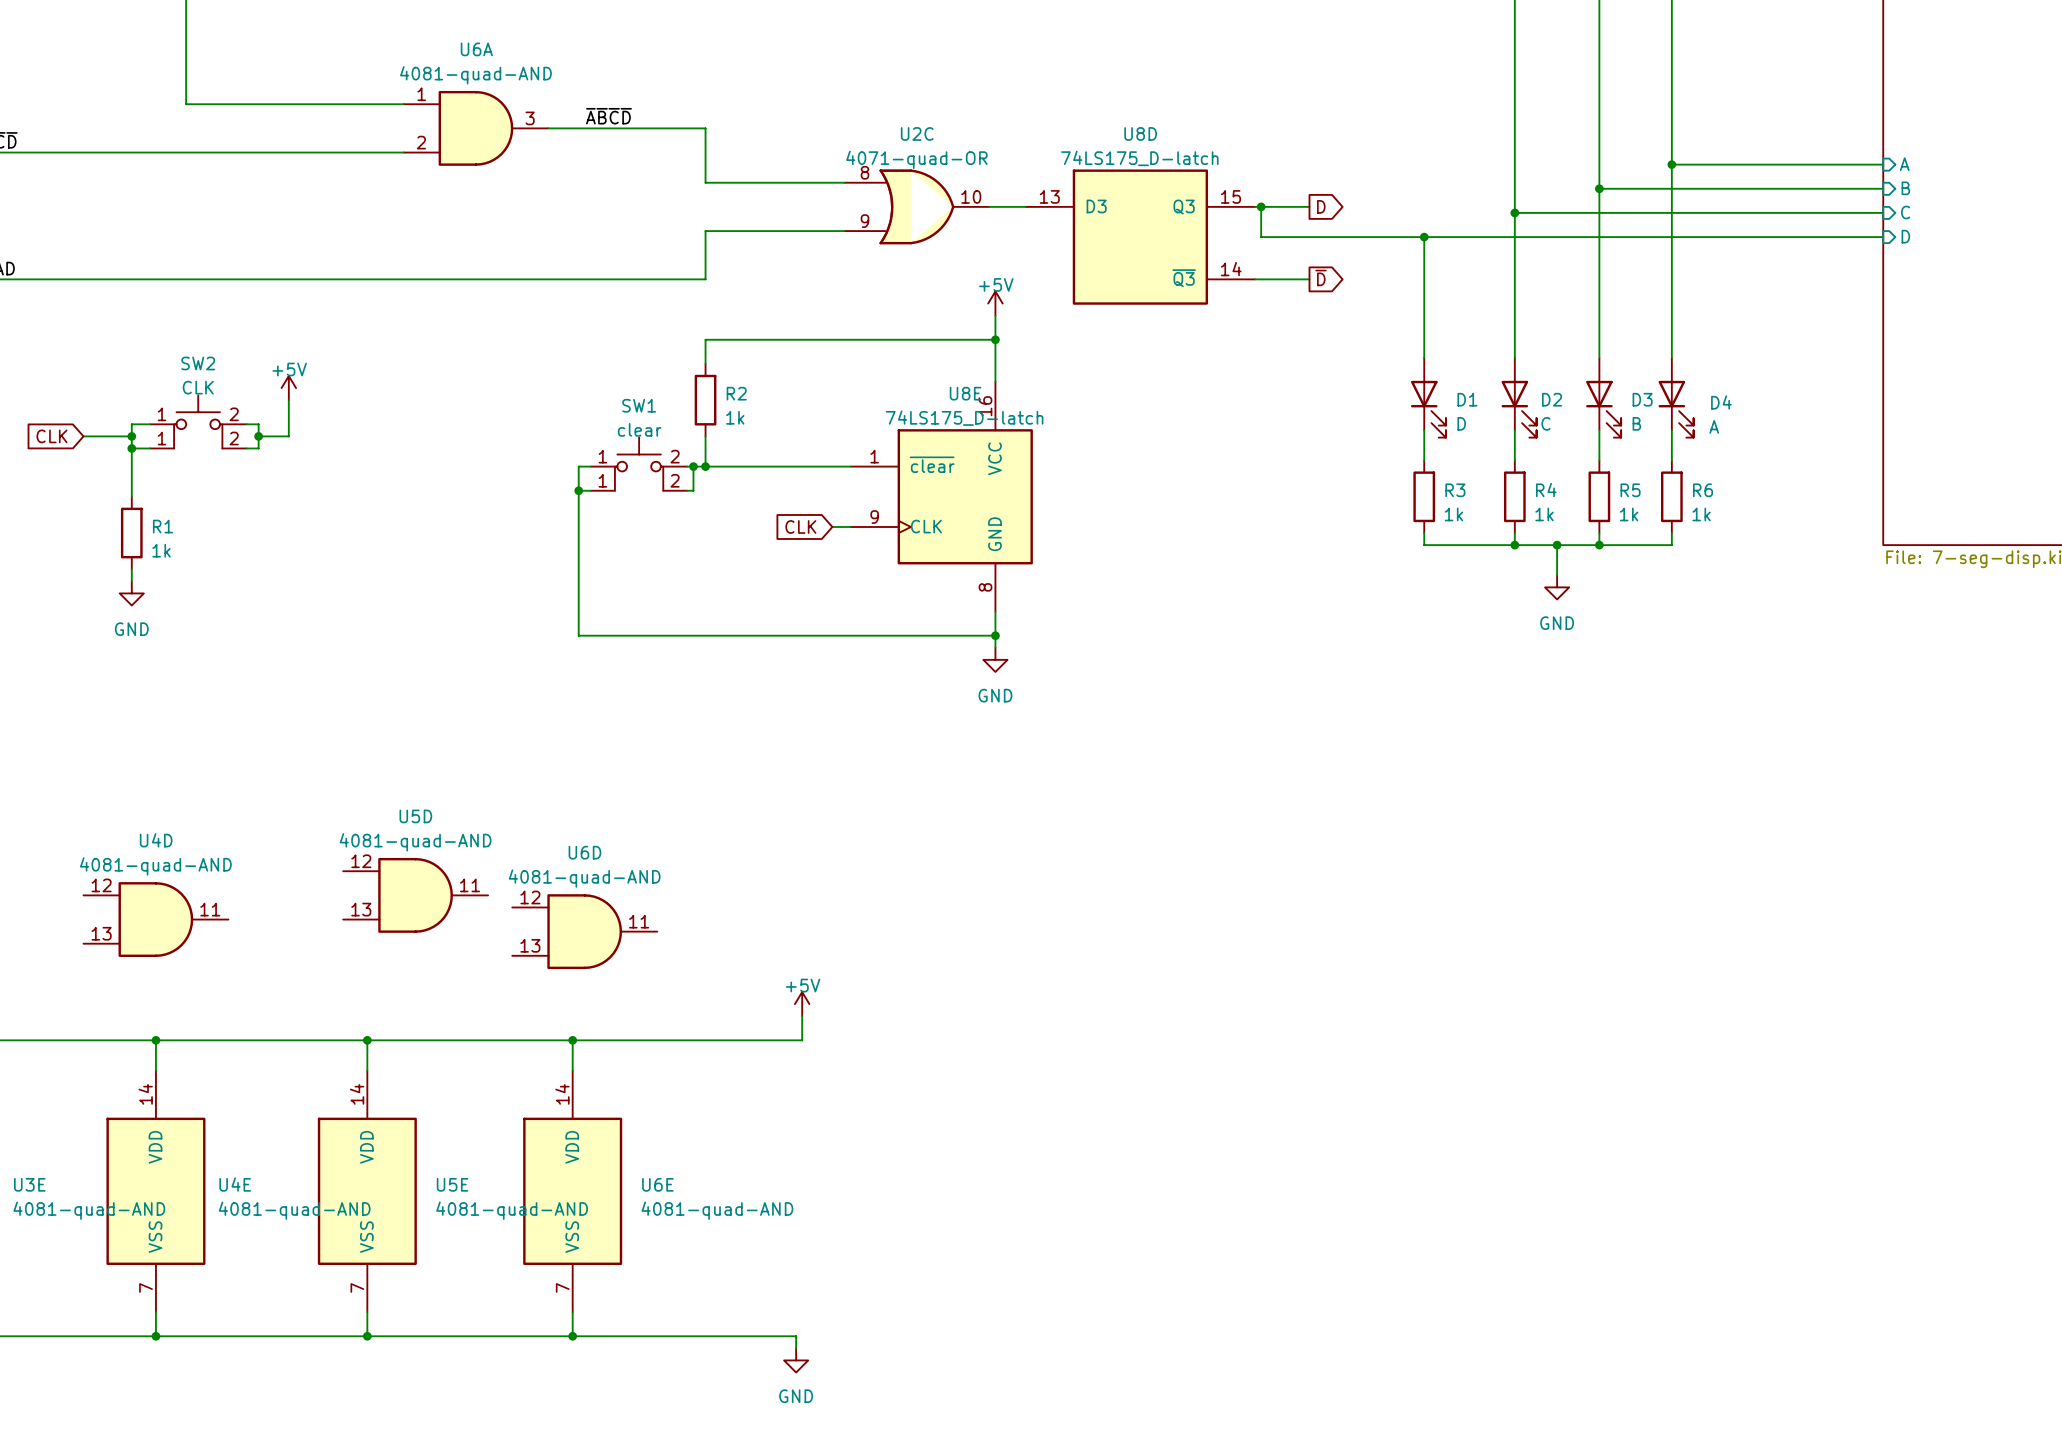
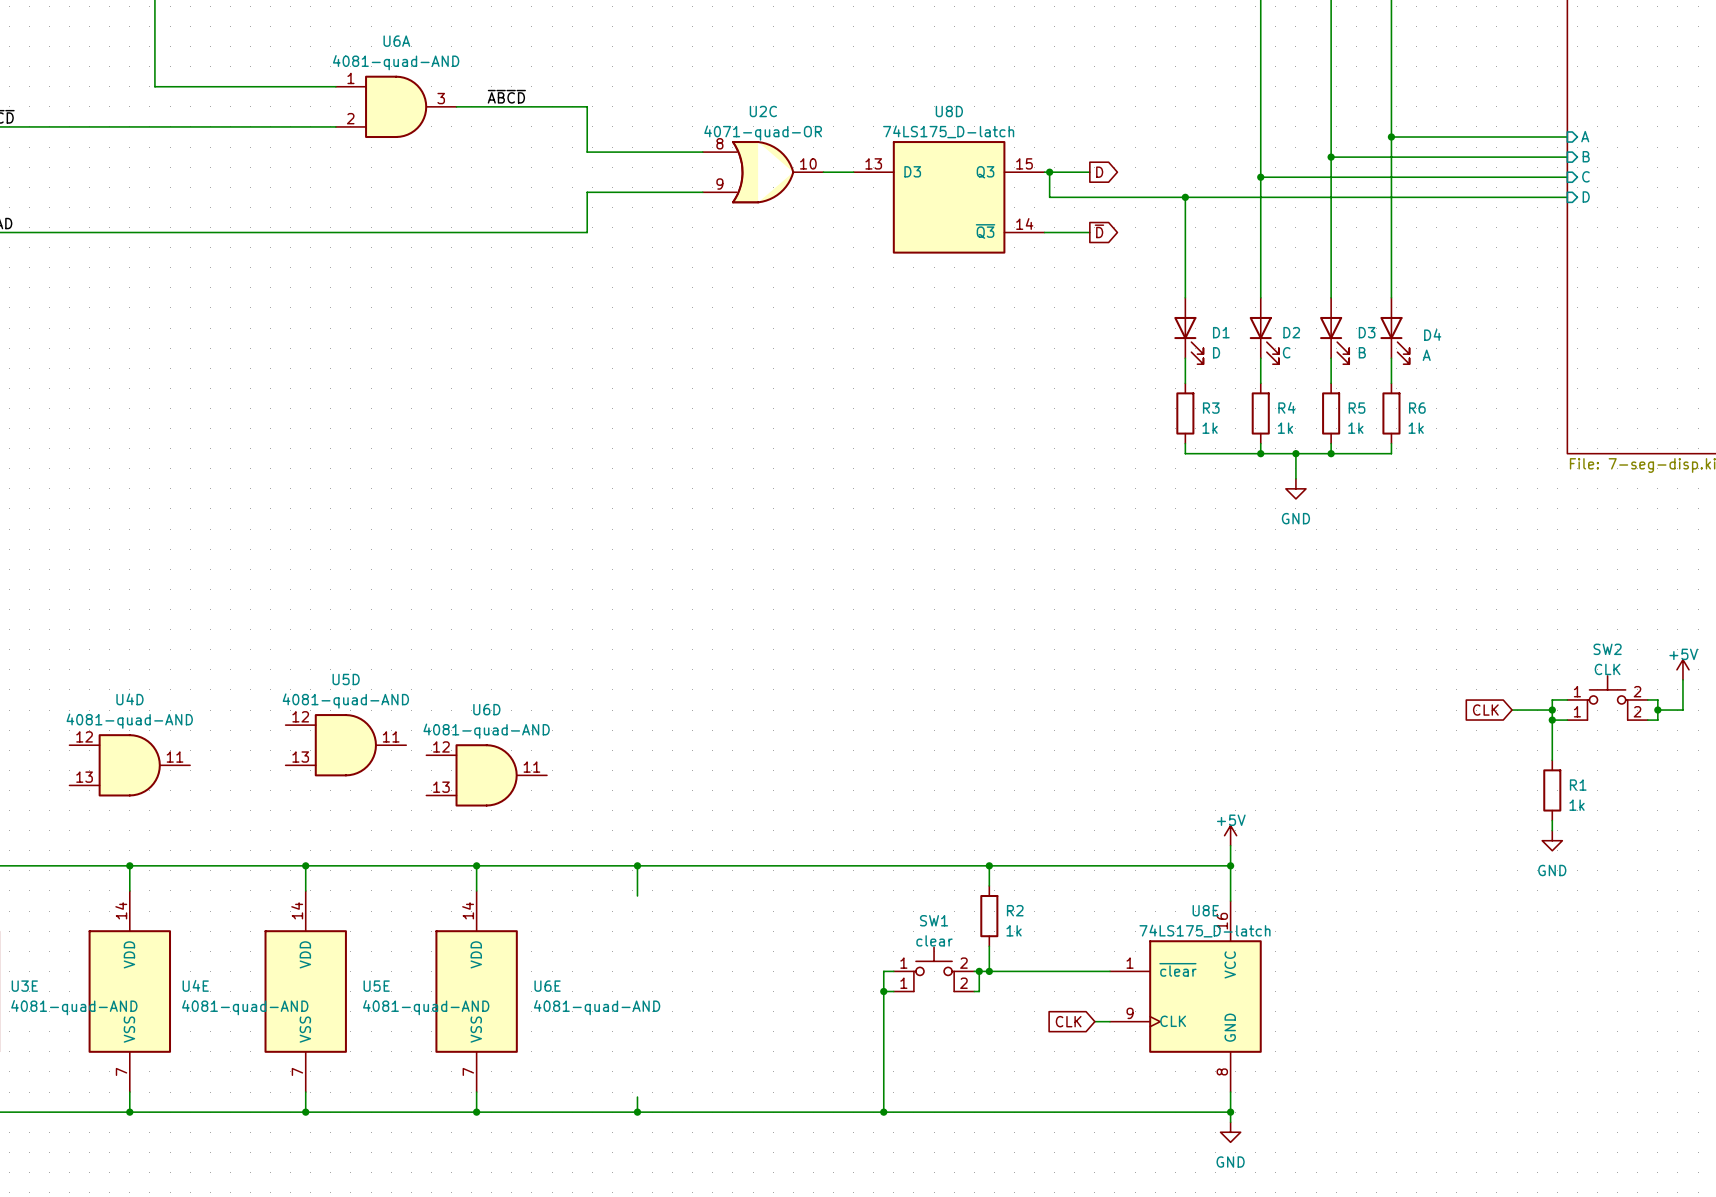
power symbol: +5V (995, 303) -> none
wire: (995, 315) (995, 382) -> none
wire: (995, 339) (705, 339) (705, 363) -> none
junction: (995, 339) -> none
power symbol: +5V (288, 388) -> none
wire: (288, 400) (288, 436) (258, 436) -> none
R2 position: (705, 400) -> (989, 916)
SW2 position: (198, 421) -> (1607, 697)
wire: (149, 424) (131, 424) (131, 496) -> none
wire: (246, 424) (258, 424) (258, 448) (246, 448) -> none
global label: CLK (51, 436) -> none
wire: (83, 436) (131, 436) -> none
junction: (131, 436) -> none
junction: (258, 436) -> none
wire: (705, 436) (705, 466) -> none
wire: (131, 448) (149, 448) -> none
junction: (131, 448) -> none
SW1 position: (639, 464) -> (934, 969)
wire: (590, 466) (578, 466) (578, 635) (995, 635) -> none
wire: (687, 466) (850, 466) -> none
wire: (693, 466) (693, 490) (687, 490) -> none
junction: (693, 466) -> none
junction: (705, 466) -> none
wire: (578, 490) (590, 490) -> none
junction: (578, 490) -> none
U8E position: (941, 496) -> (1185, 996)
global label: CLK (800, 526) -> none
wire: (832, 526) (850, 526) -> none
R1 position: (131, 533) -> (1552, 790)
wire: (131, 569) (131, 581) -> none
power symbol: GND (131, 593) -> none
wire: (995, 611) (995, 647) -> none
junction: (995, 635) -> none
power symbol: GND (995, 659) -> none
power symbol: none -> +5V (1682, 669)
wire: none -> (1682, 679) (1682, 710) (1657, 710)
wire: none -> (1567, 699) (1552, 699) (1552, 760)
wire: none -> (1647, 699) (1657, 699) (1657, 720) (1647, 720)
global label: none -> CLK (1485, 710)
wire: none -> (1512, 710) (1552, 710)
junction: none -> (1552, 710)
junction: none -> (1657, 710)
wire: none -> (1552, 720) (1567, 720)
junction: none -> (1552, 720)
wire: none -> (1552, 820) (1552, 830)
power symbol: +5V (802, 1004) -> none
power symbol: none -> +5V (1230, 835)
power symbol: none -> GND (1552, 840)
wire: (802, 1016) (802, 1040) -> (1230, 865) (667, 865)
wire: none -> (1230, 845) (1230, 901)
wire: none -> (637, 865) (637, 896)
junction: none -> (637, 865)
wire: none -> (989, 865) (989, 885)
junction: none -> (989, 865)
junction: none -> (1230, 865)
wire: none -> (989, 946) (989, 971)
wire: none -> (893, 971) (883, 971) (883, 1112)
wire: none -> (974, 971) (1109, 971)
wire: none -> (979, 971) (979, 991) (974, 991)
junction: none -> (979, 971)
junction: none -> (989, 971)
wire: none -> (883, 991) (893, 991)
junction: none -> (883, 991)
global label: none -> CLK (1068, 1021)
wire: none -> (1094, 1021) (1109, 1021)
wire: none -> (1230, 1092) (1230, 1122)
wire: none -> (637, 1097) (637, 1112)
junction: none -> (637, 1112)
wire: (796, 1336) (796, 1348) -> (662, 1112) (1230, 1112)
junction: none -> (883, 1112)
junction: none -> (1230, 1112)
power symbol: GND (796, 1360) -> none
power symbol: none -> GND (1230, 1132)

